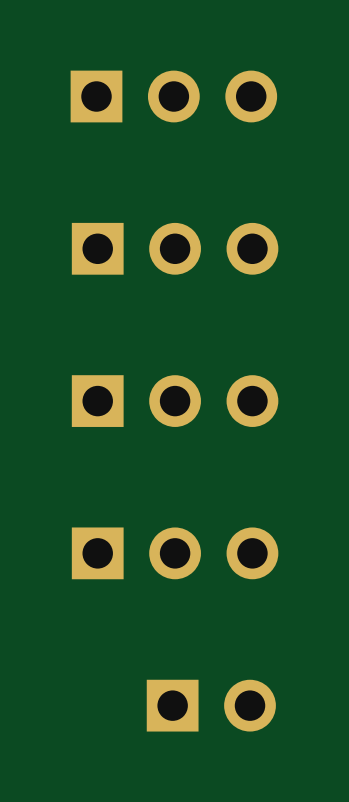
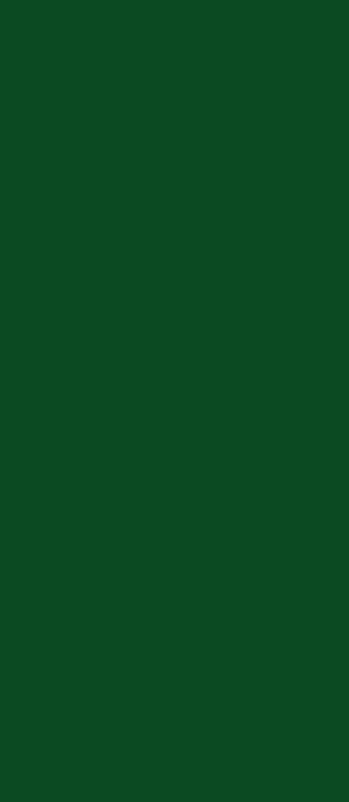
part: (173, 96) -> none
part: (175, 248) -> none
part: (175, 401) -> none
part: (175, 553) -> none
part: (211, 705) -> none

